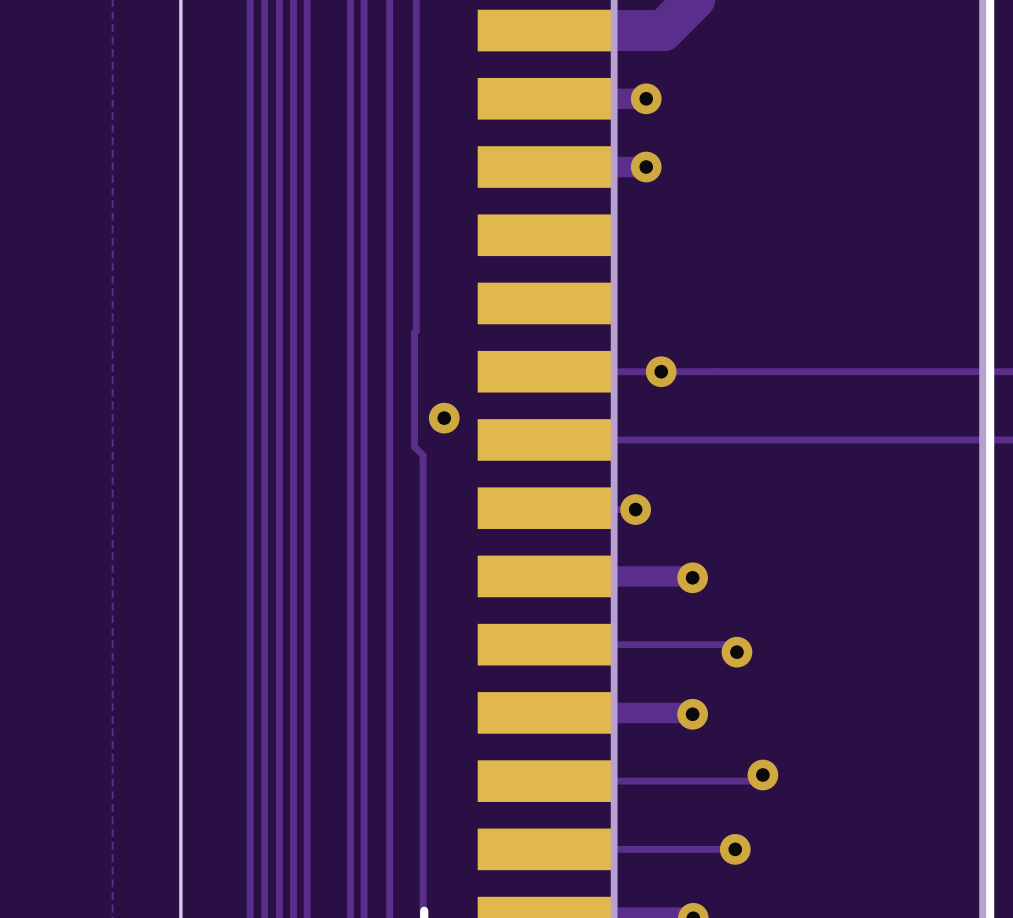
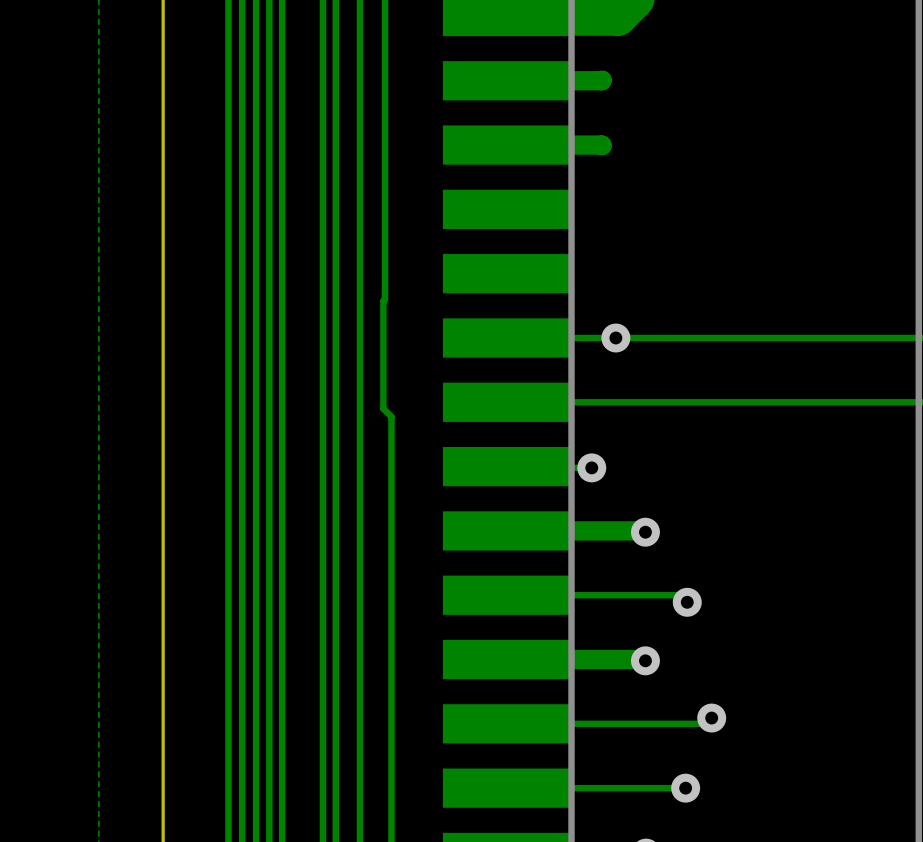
via: (646, 98) -> none
via: (646, 167) -> none
via: (444, 418) -> none

